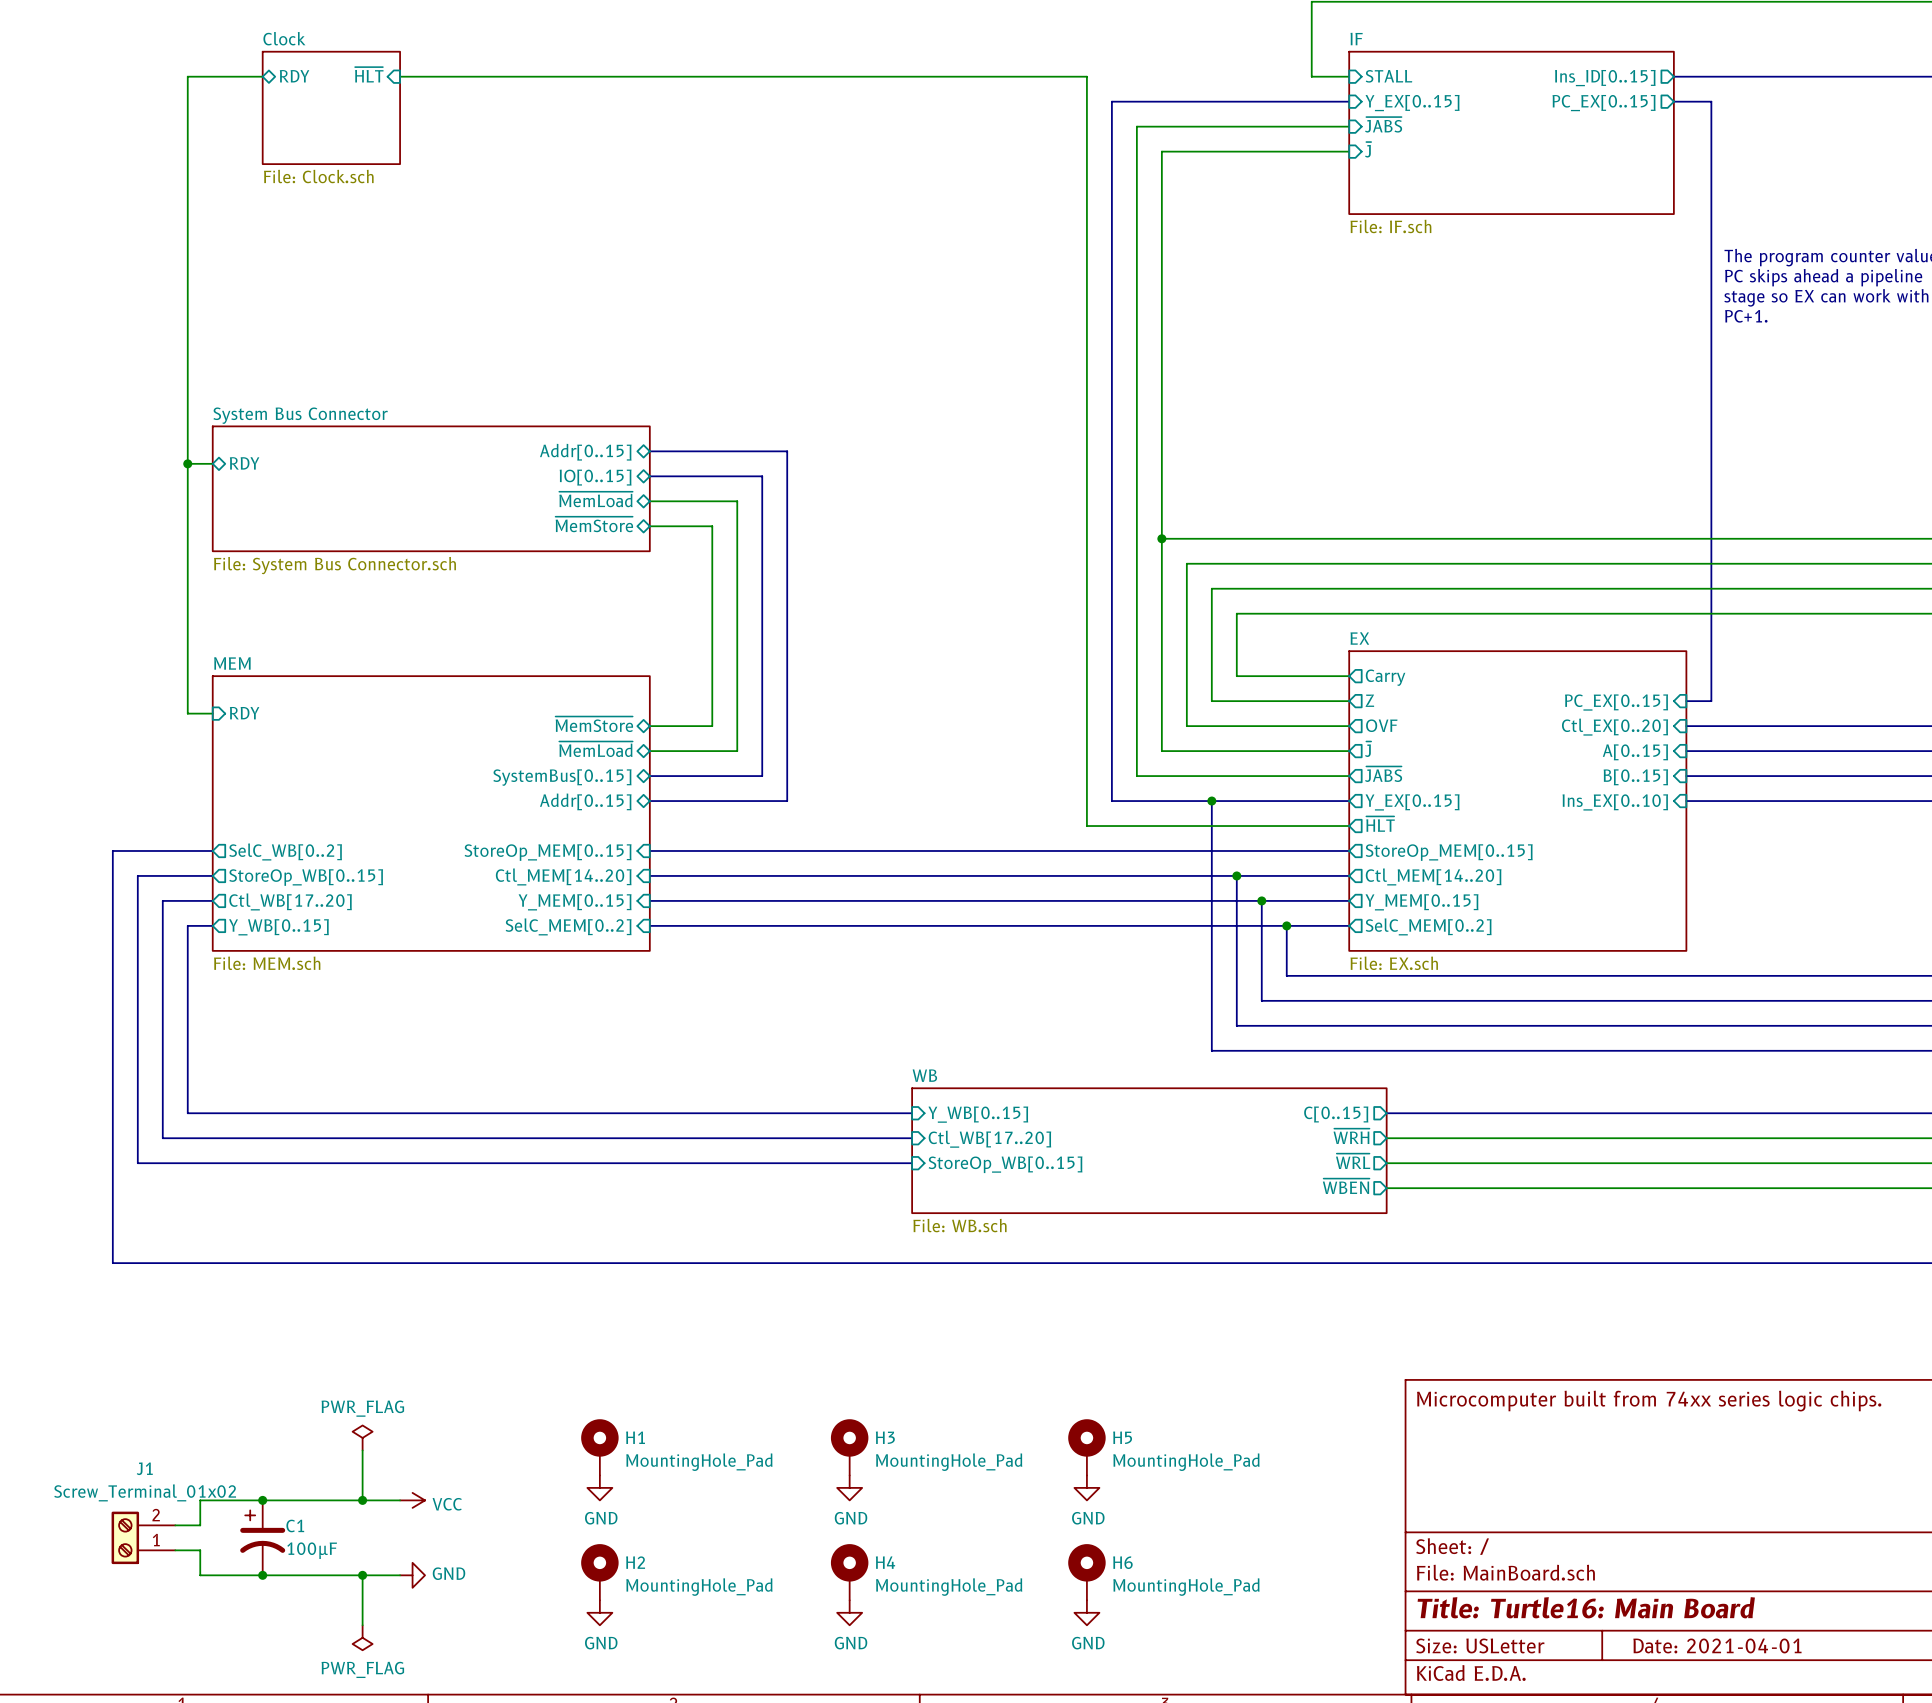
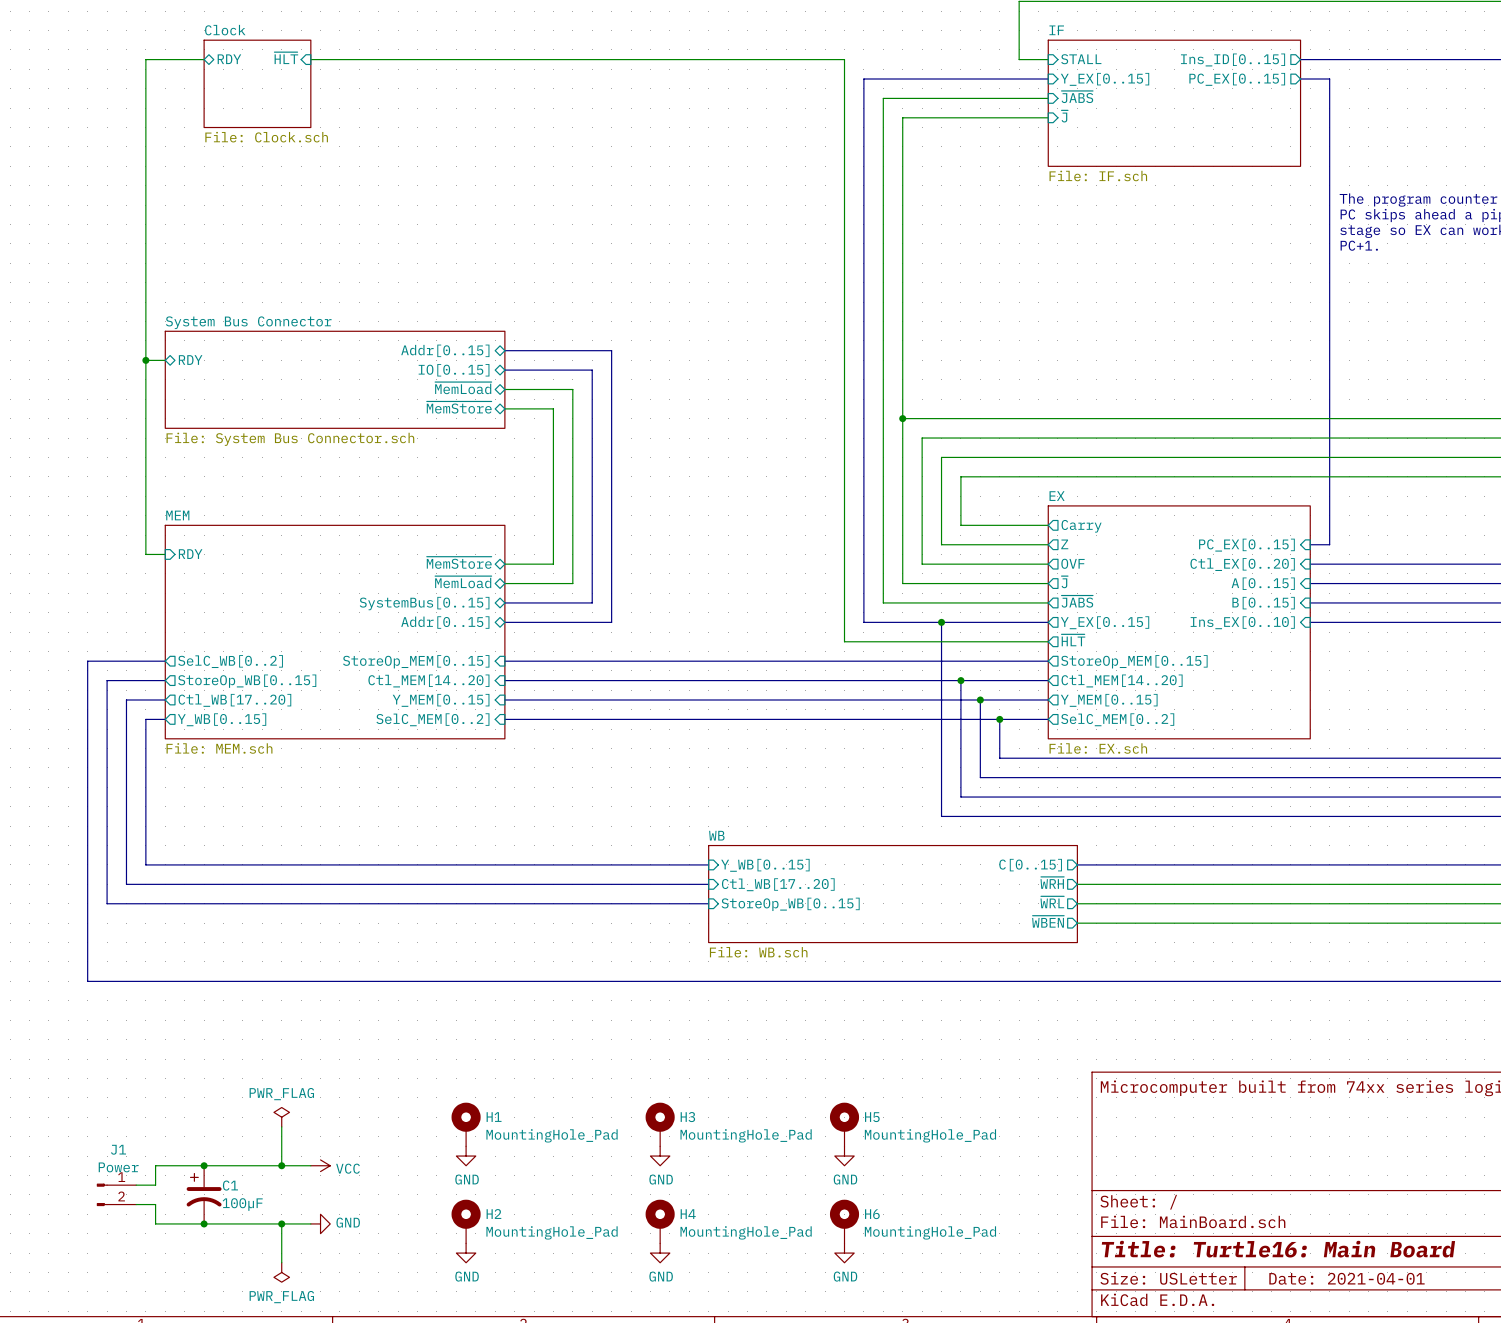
J1 value: Screw_Terminal_01x02 (145, 1492) -> Power (118, 1167)
J1 symbol: [111, 1511, 176, 1565] -> [96, 1183, 137, 1207]

